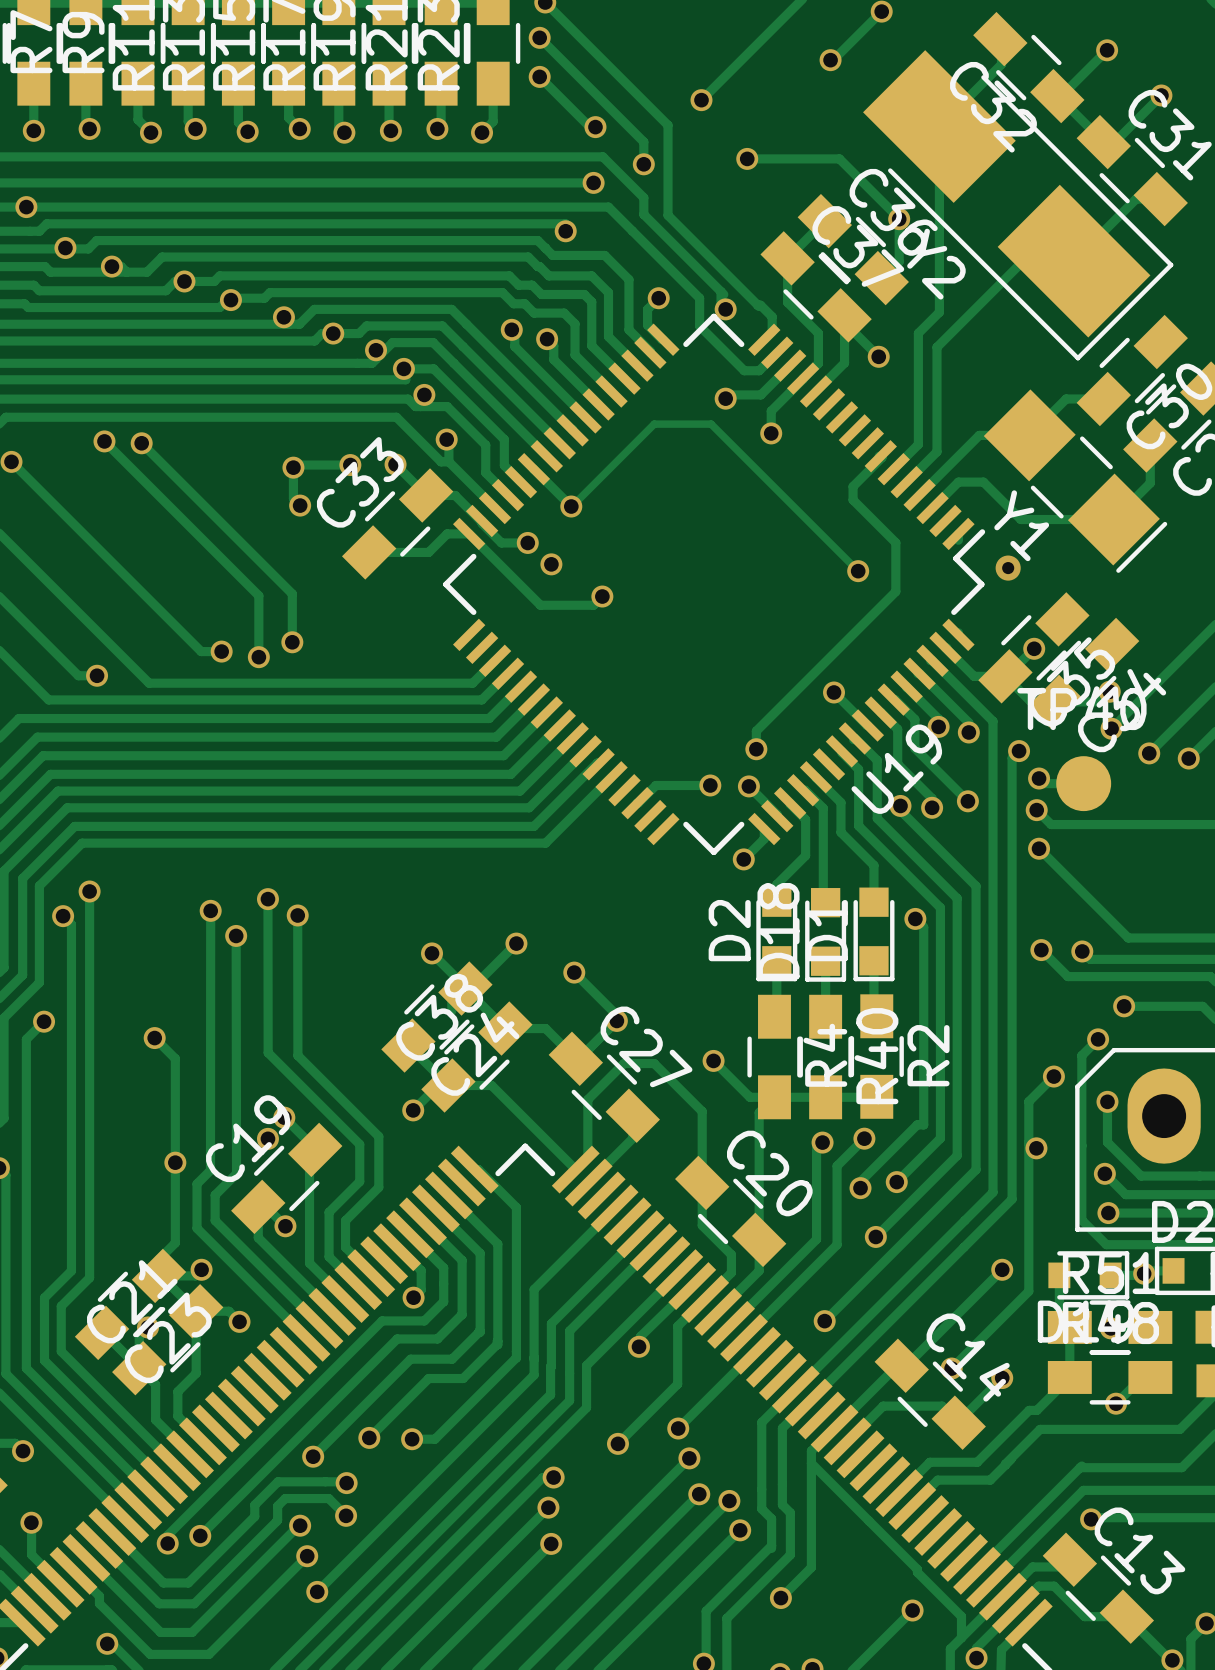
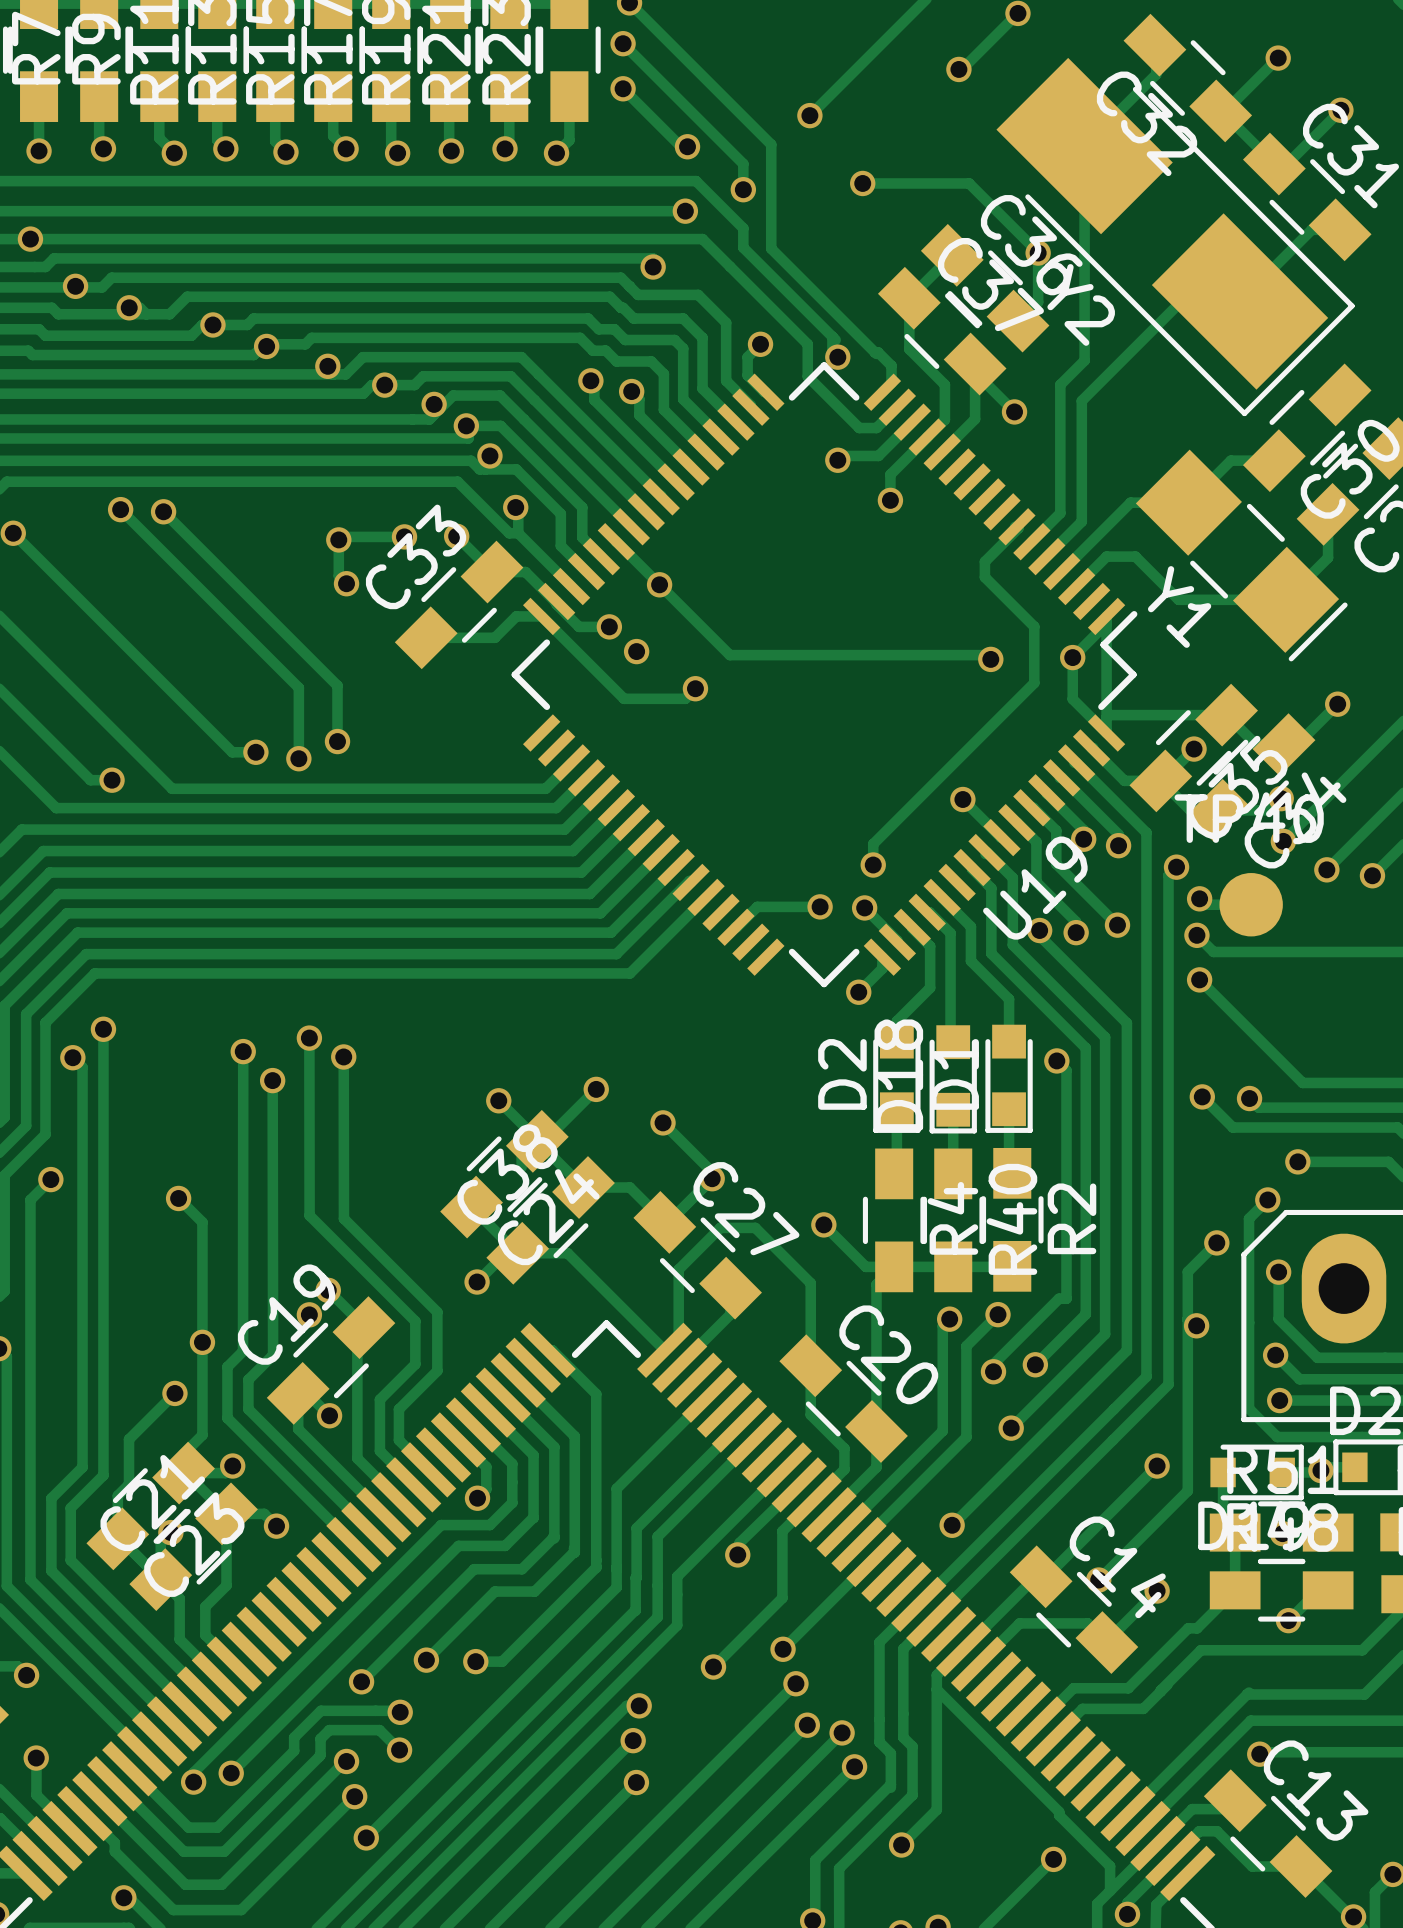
track: (571, 506) (654, 424) (711, 424) (858, 571) -> (659, 584) (729, 655) (986, 655)
via: (1008, 568) -> none
via: none -> (1072, 657)
track: none -> (1337, 704) (1297, 744)
via: none -> (1337, 704)
track: none -> (1106, 717) (1109, 715) (1226, 715) (1256, 744) (1284, 744)
track: none -> (1106, 730) (1106, 623) (1072, 657) (1072, 699) (1106, 732)
track: none -> (174, 1393) (129, 1439) (129, 1484) (117, 1495) (117, 1538)
via: none -> (174, 1393)

